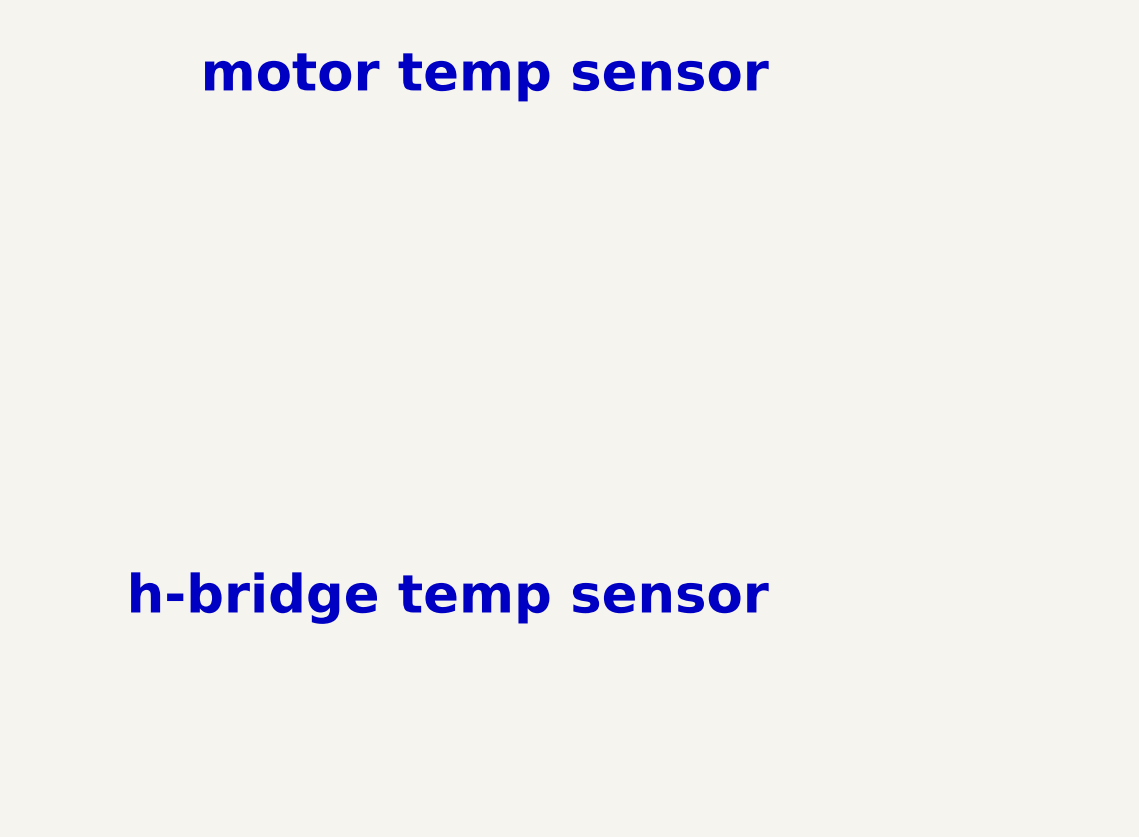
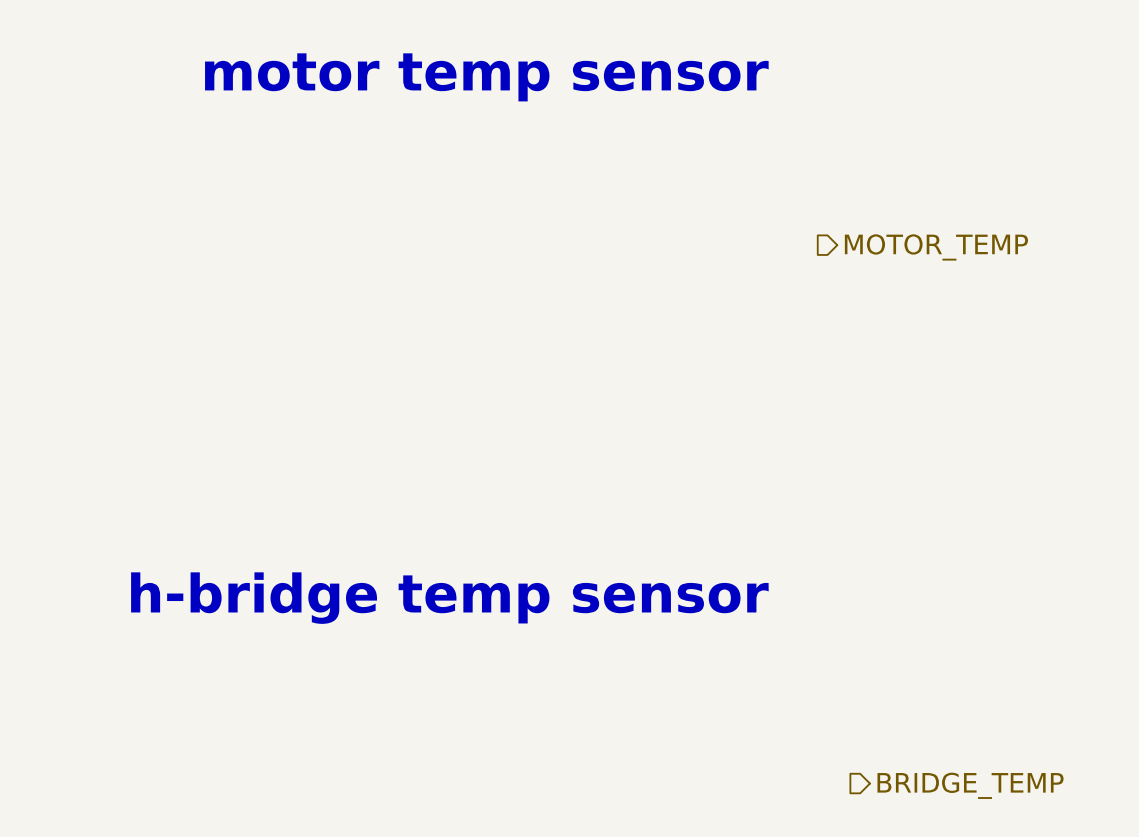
hierarchical label: none -> MOTOR_TEMP (936, 247)
hierarchical label: none -> BRIDGE_TEMP (970, 785)

